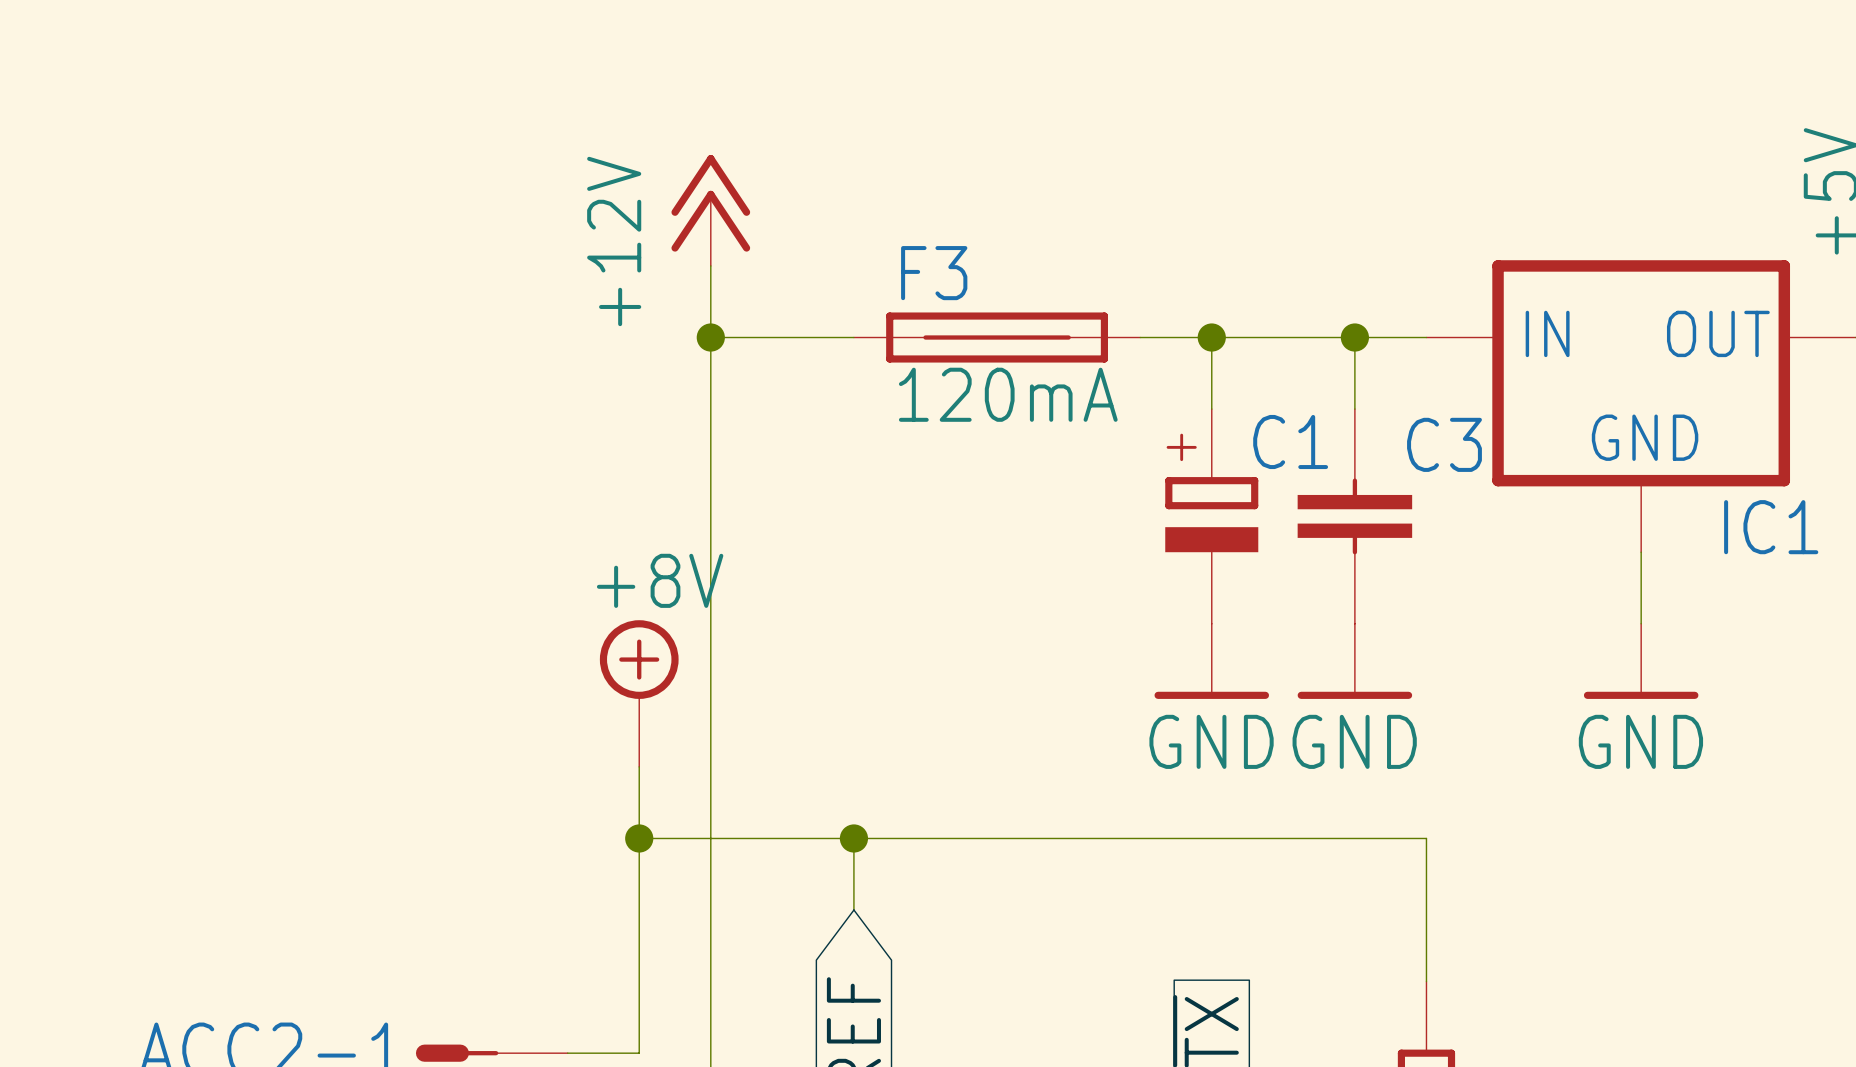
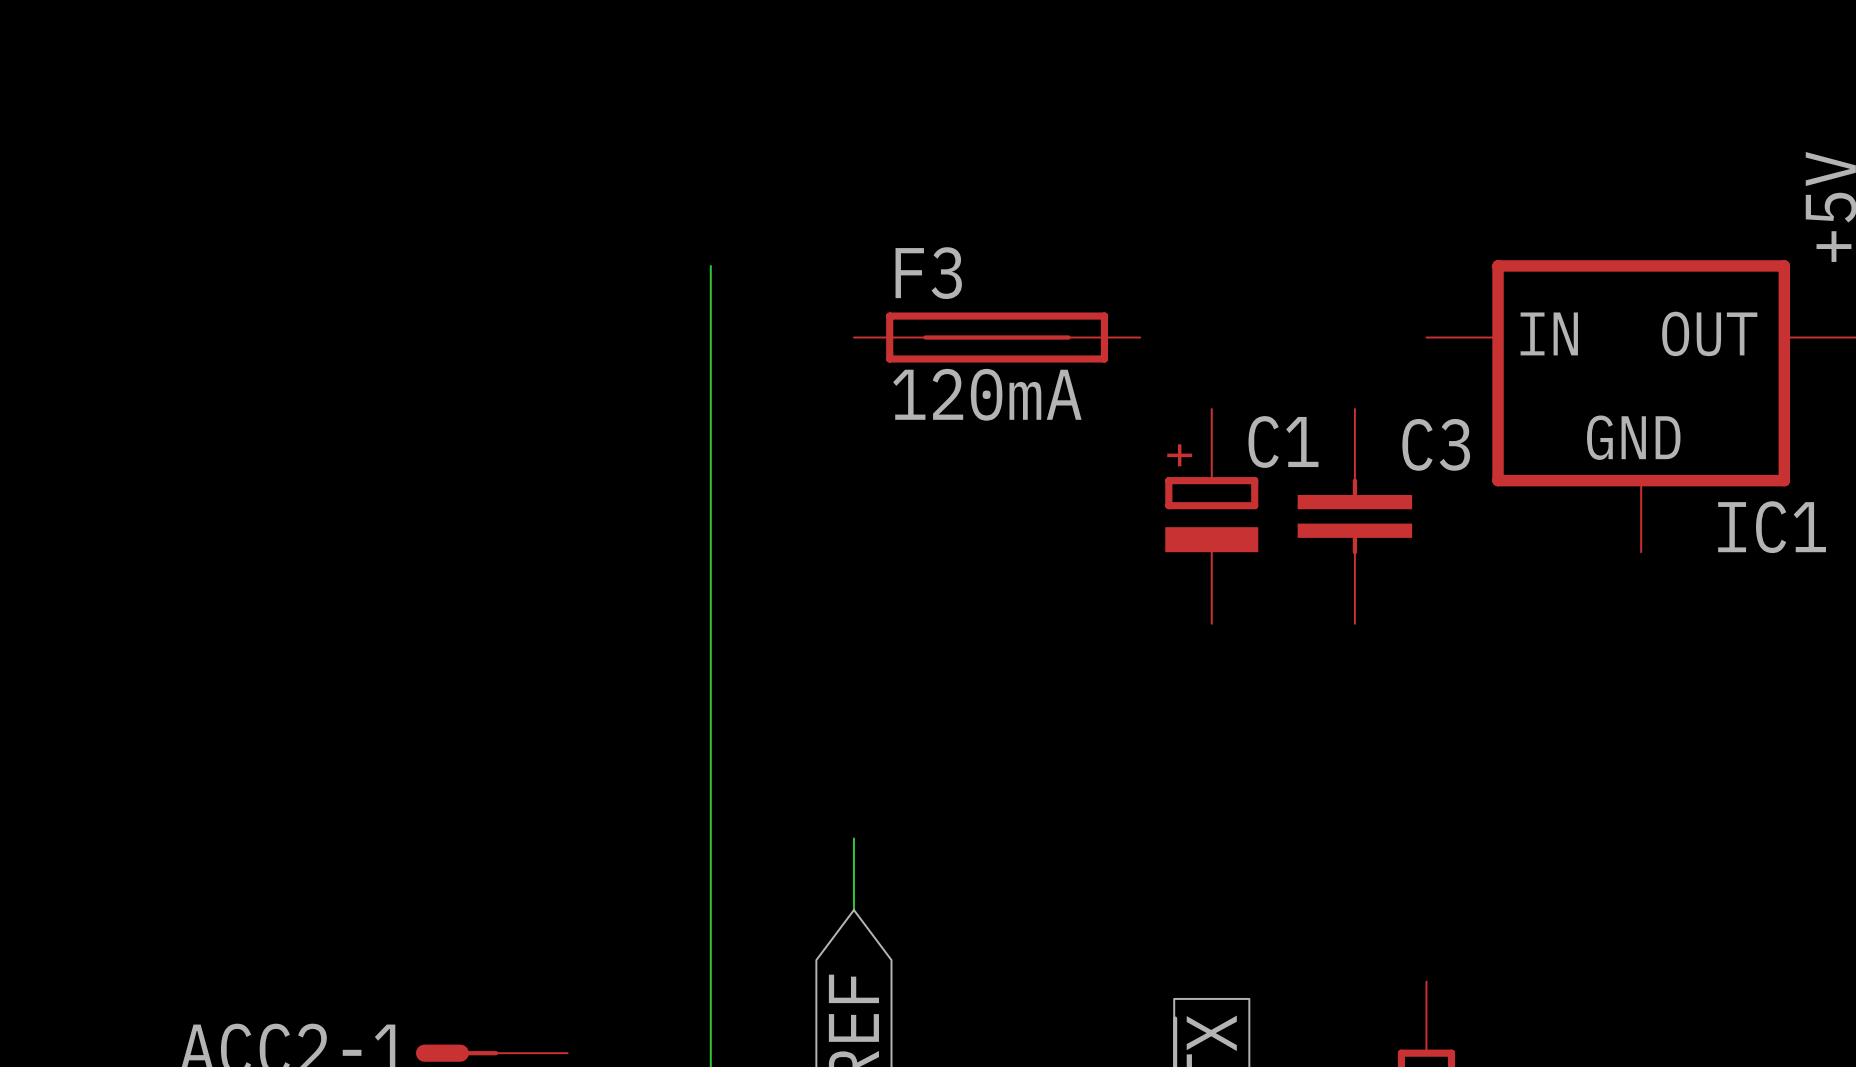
power symbol: +12V (710, 210) -> none
wire: (710, 337) (853, 337) -> none
junction: (710, 337) -> none
wire: (1140, 337) (1426, 337) -> none
wire: (1211, 337) (1211, 409) -> none
junction: (1211, 337) -> none
wire: (1354, 337) (1354, 409) -> none
junction: (1354, 337) -> none
wire: (1641, 552) (1641, 623) -> none
power symbol: GND (1211, 661) -> none
power symbol: GND (1354, 661) -> none
power symbol: GND (1641, 661) -> none
power symbol: +8V (639, 693) -> none
wire: (639, 766) (639, 1053) (567, 1053) -> none
wire: (639, 838) (1426, 838) (1426, 981) -> none
junction: (639, 838) -> none
junction: (853, 838) -> none

